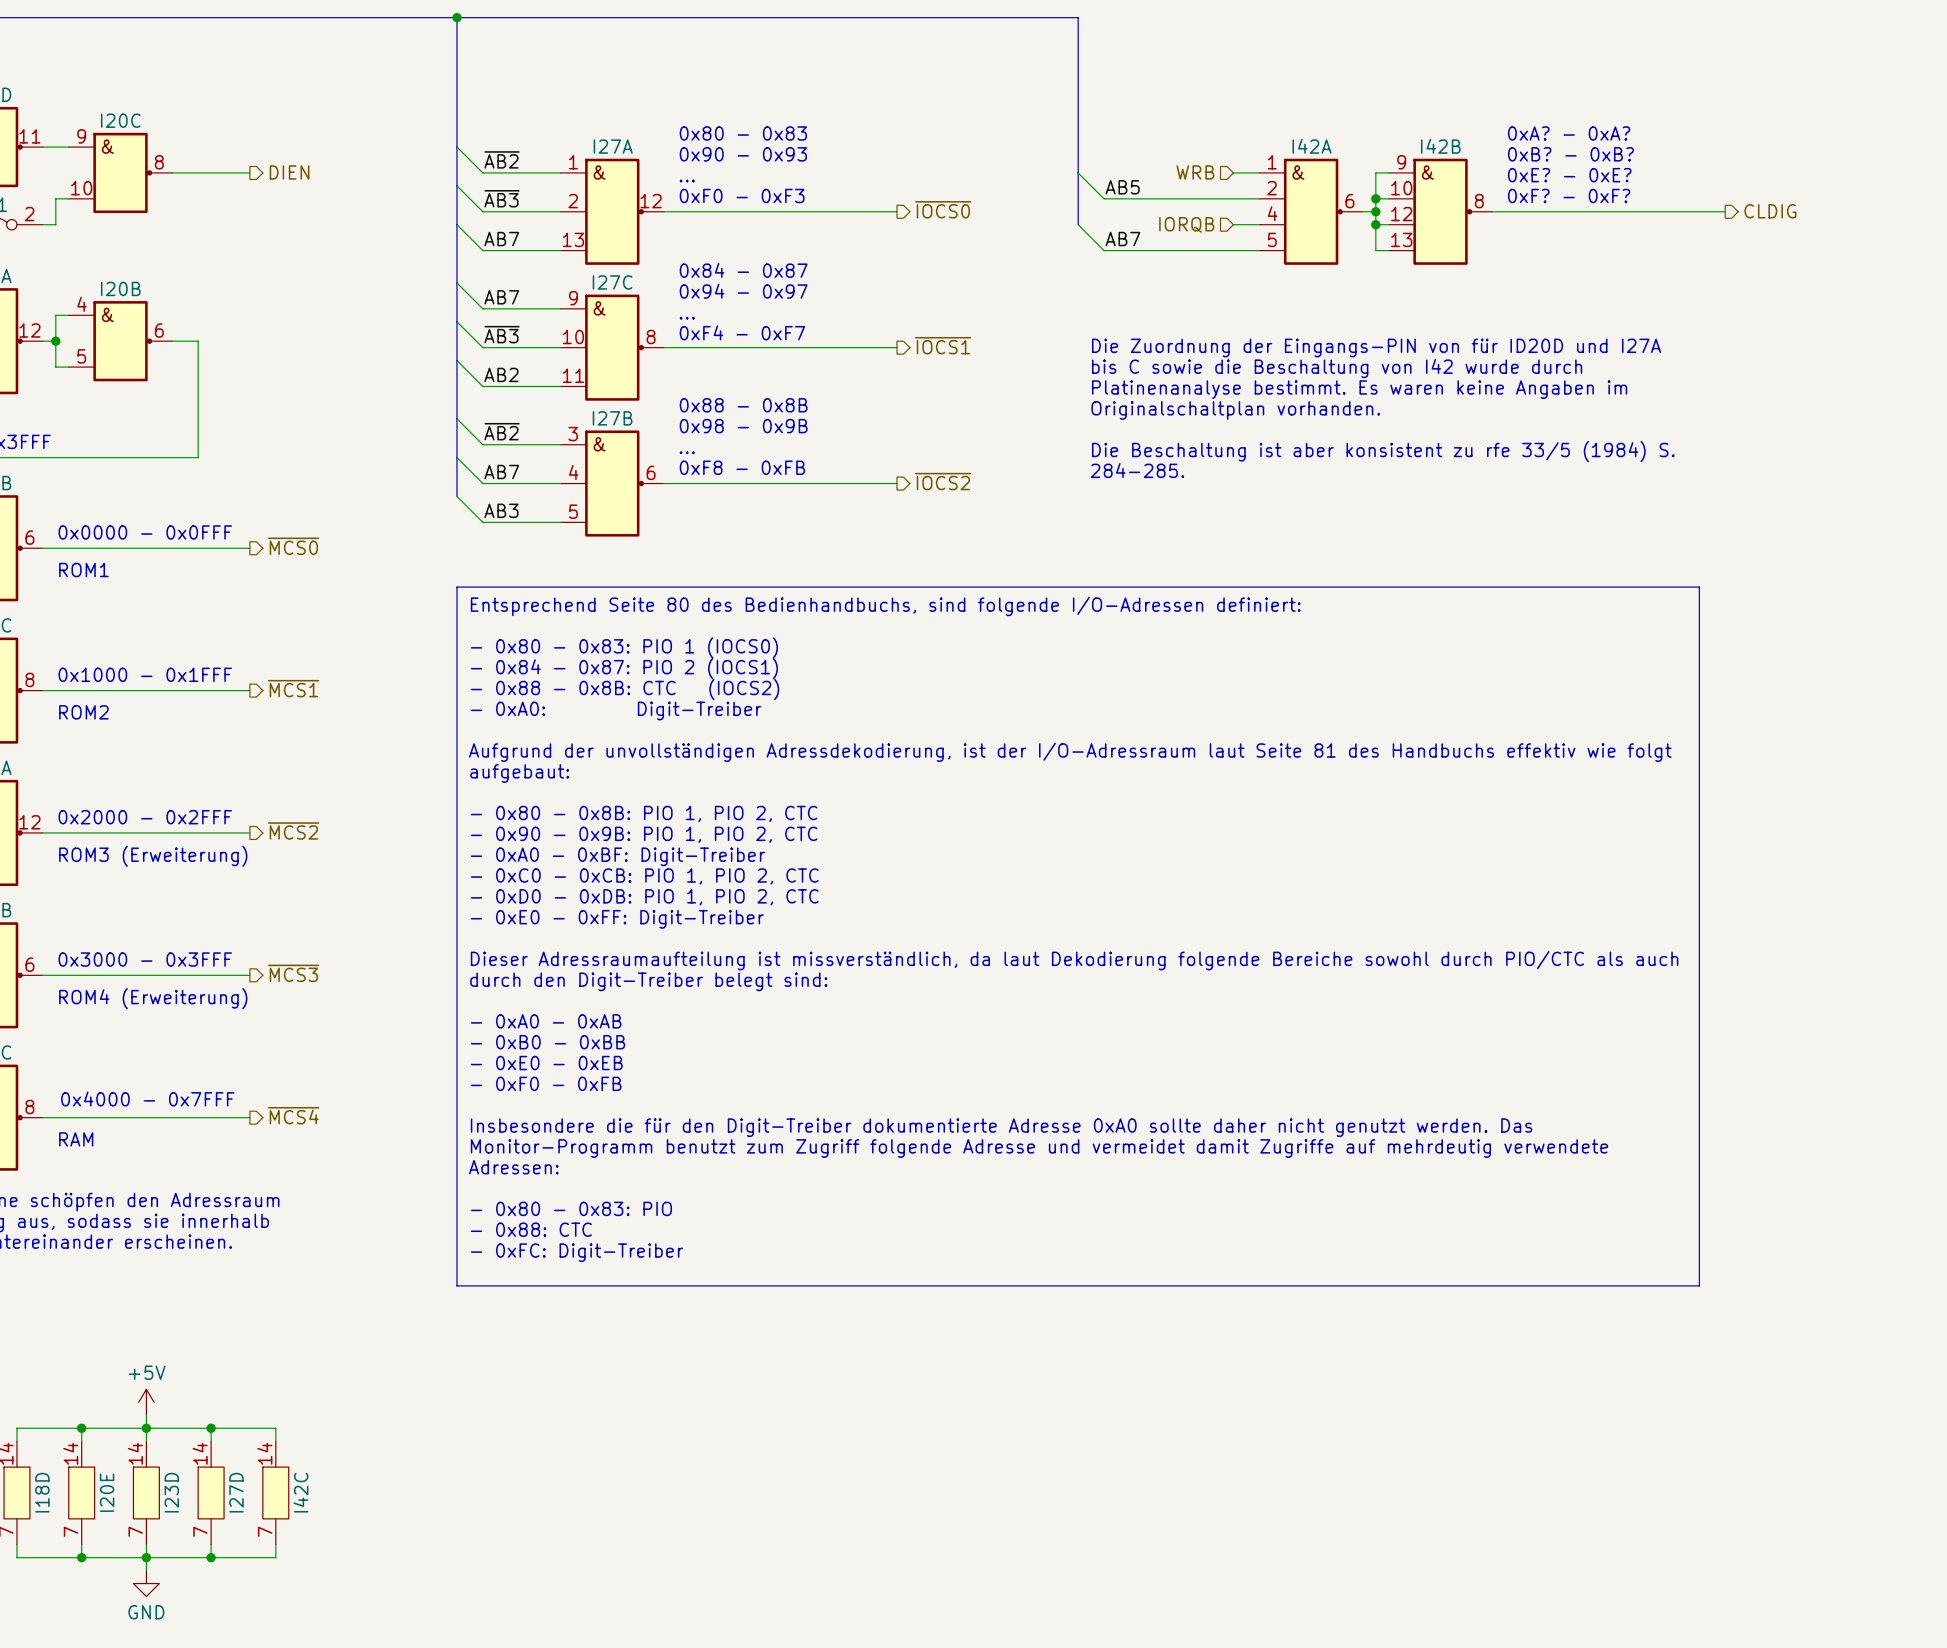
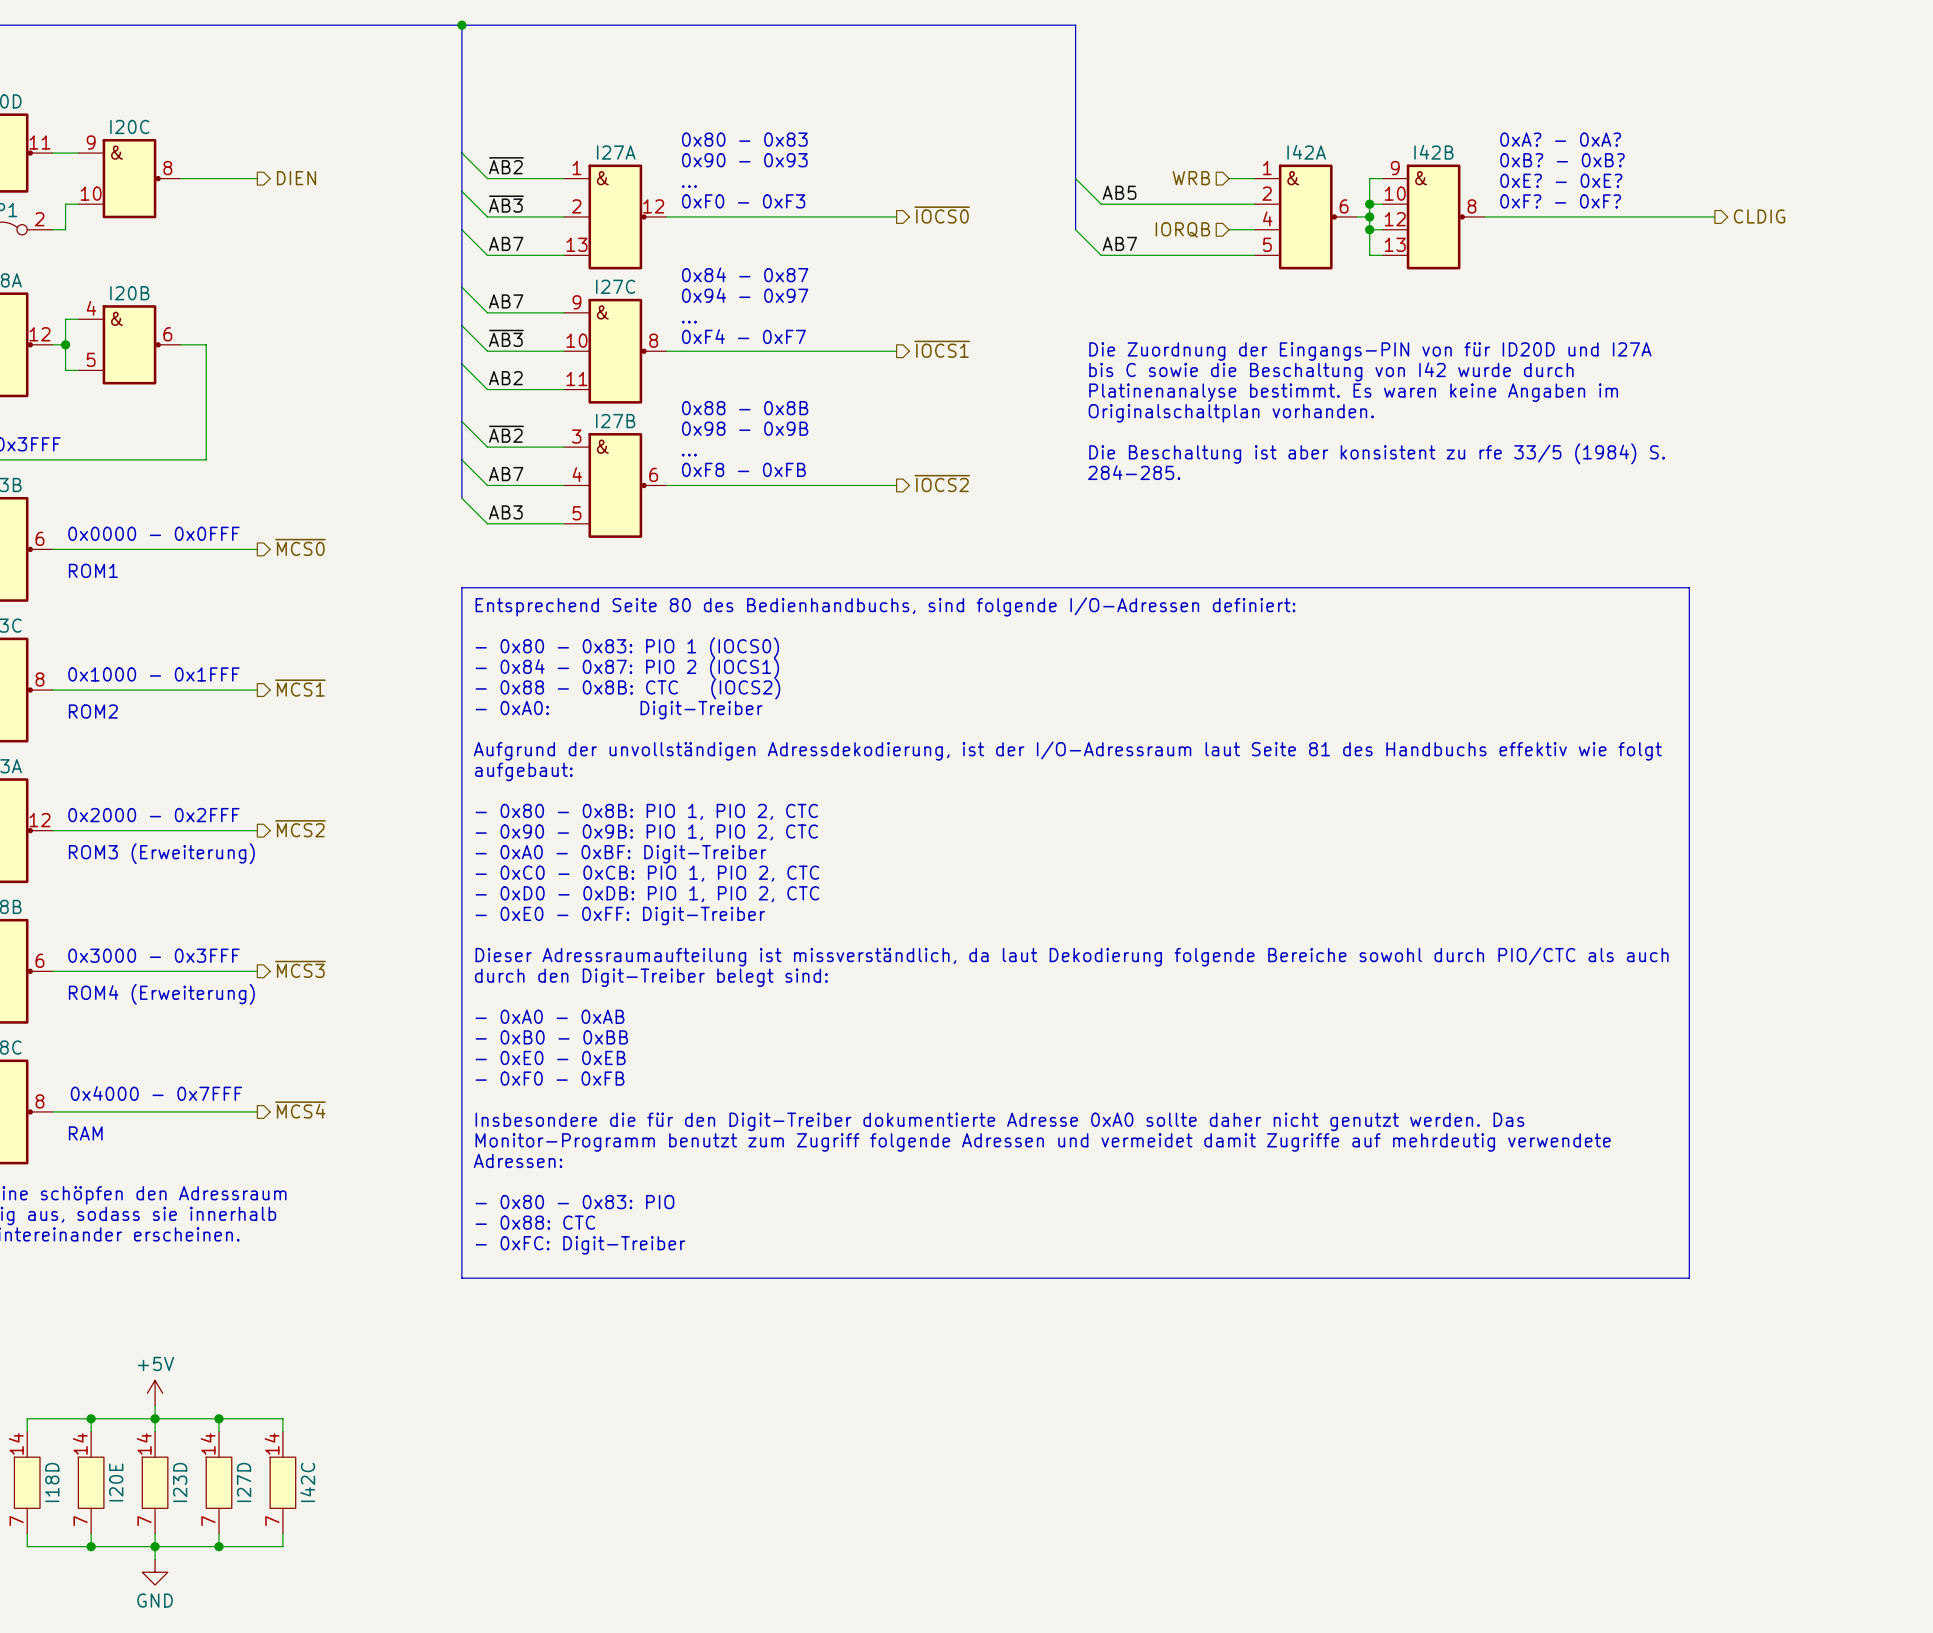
text: Monitor-Programm benutzt zum Zugriff folgende Adresse und vermeidet damit Zugriffe auf mehrdeutig verwendete (1039, 1148) -> Monitor-Programm benutzt zum Zugriff folgende Adressen und vermeidet damit Zugriffe auf mehrdeutig verwendete (1043, 1142)

